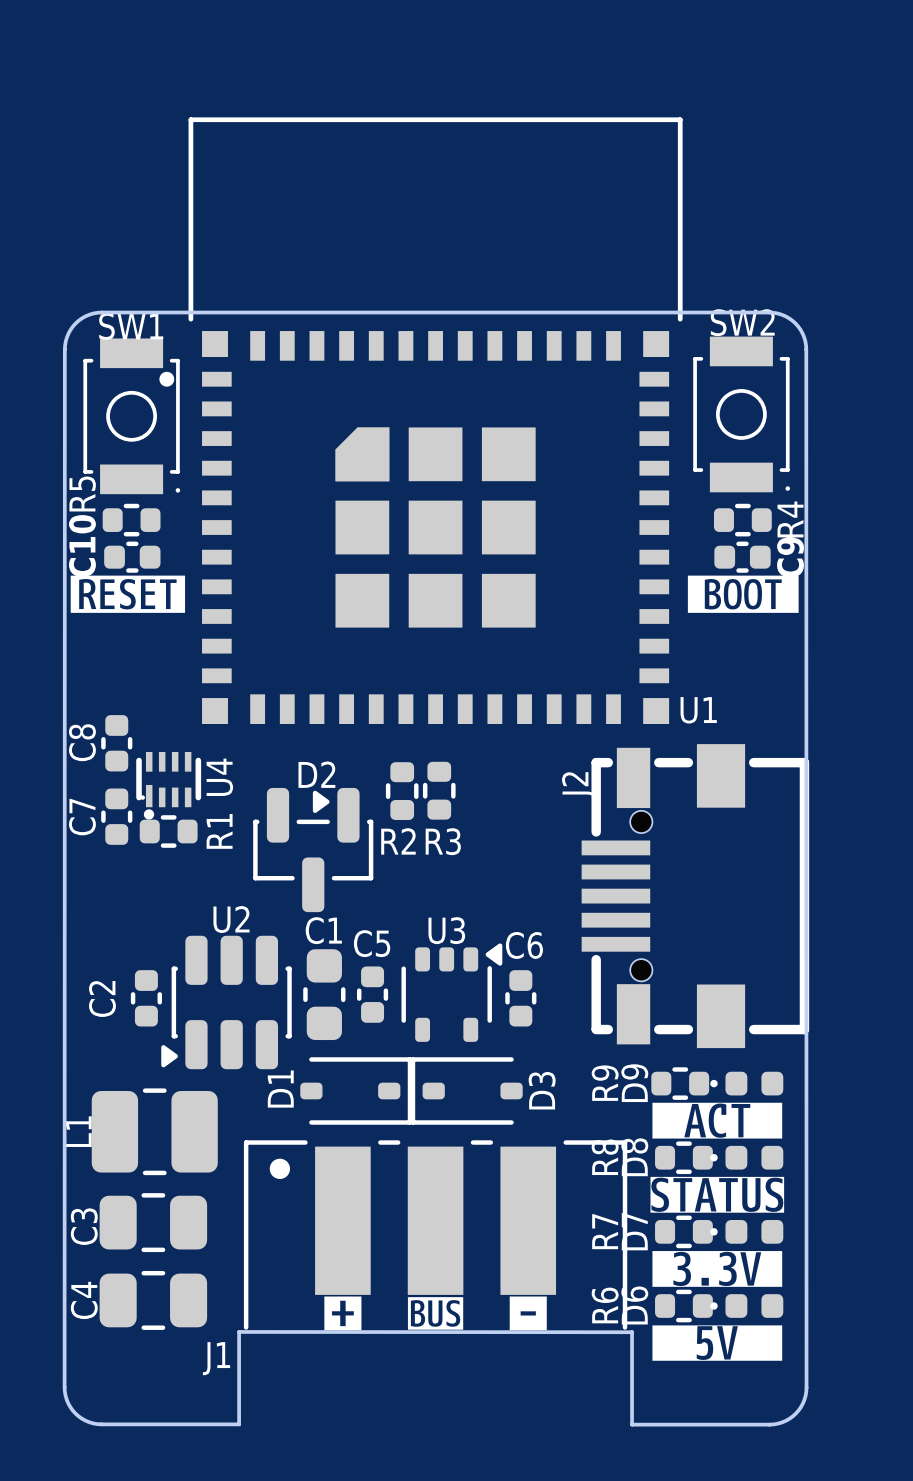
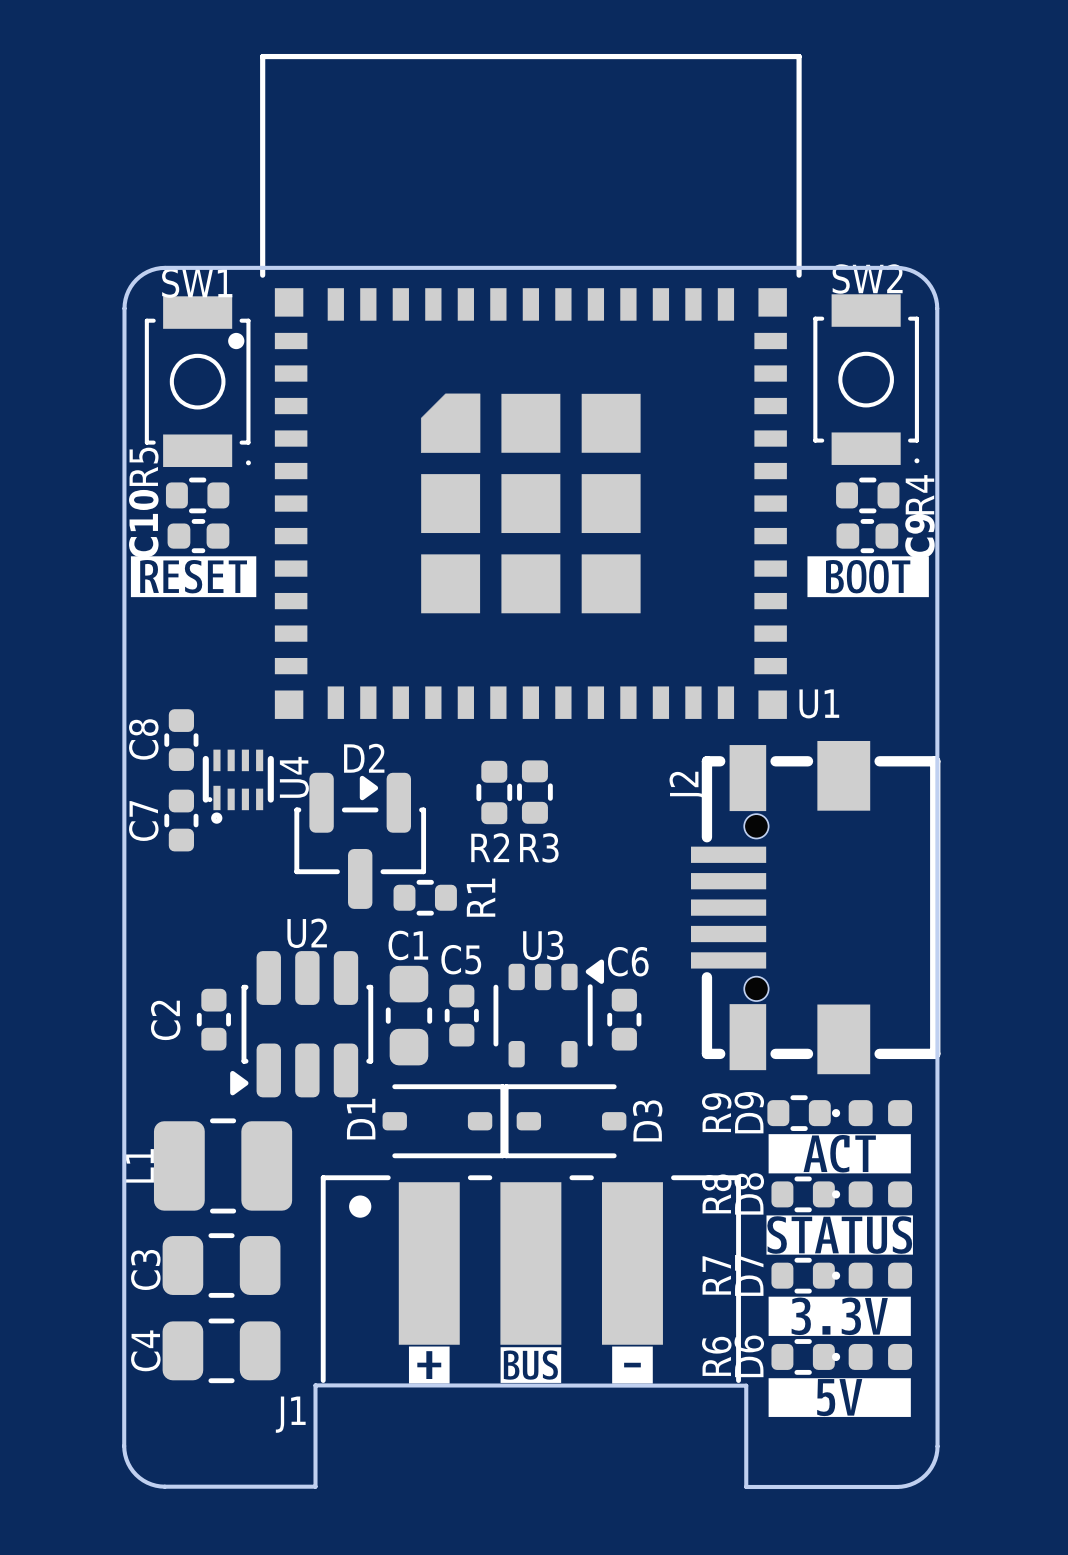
R1 position: (168, 831) -> (425, 897)
D2 position: (313, 850) -> (360, 840)

